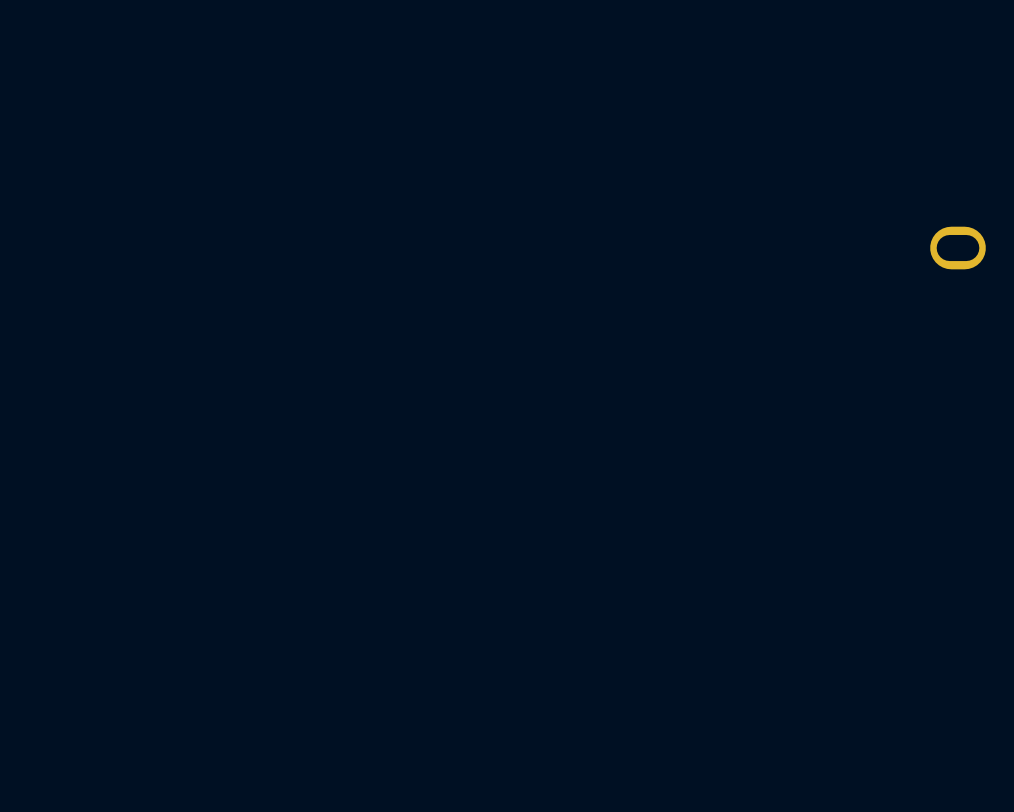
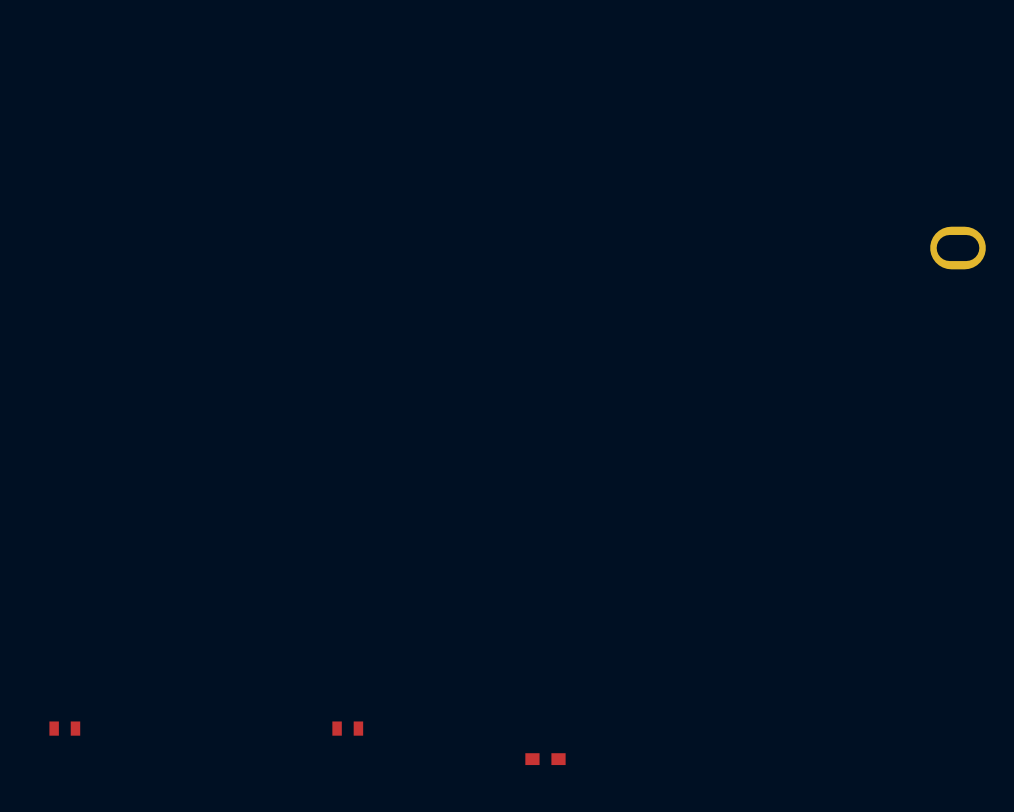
part: none -> (64, 728)
part: none -> (347, 728)
part: none -> (545, 759)

